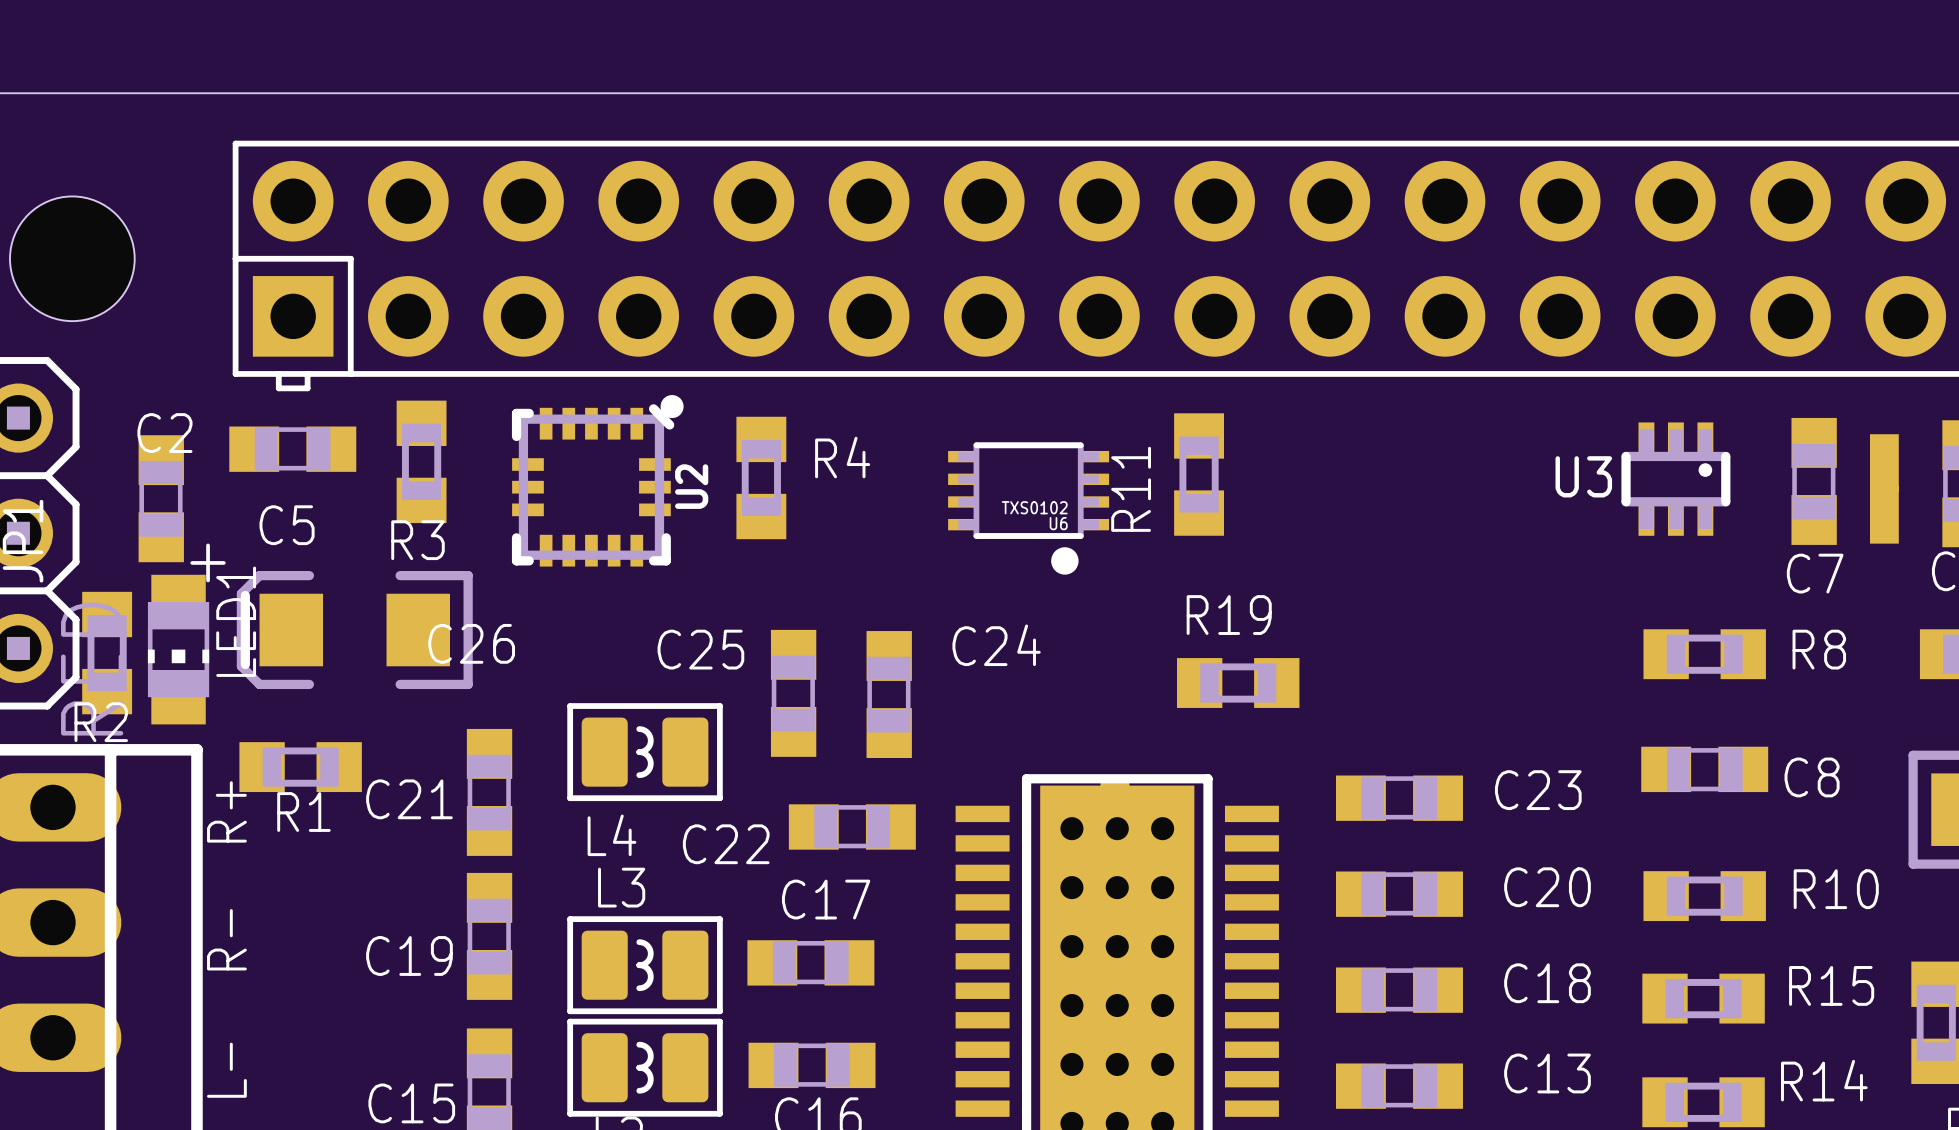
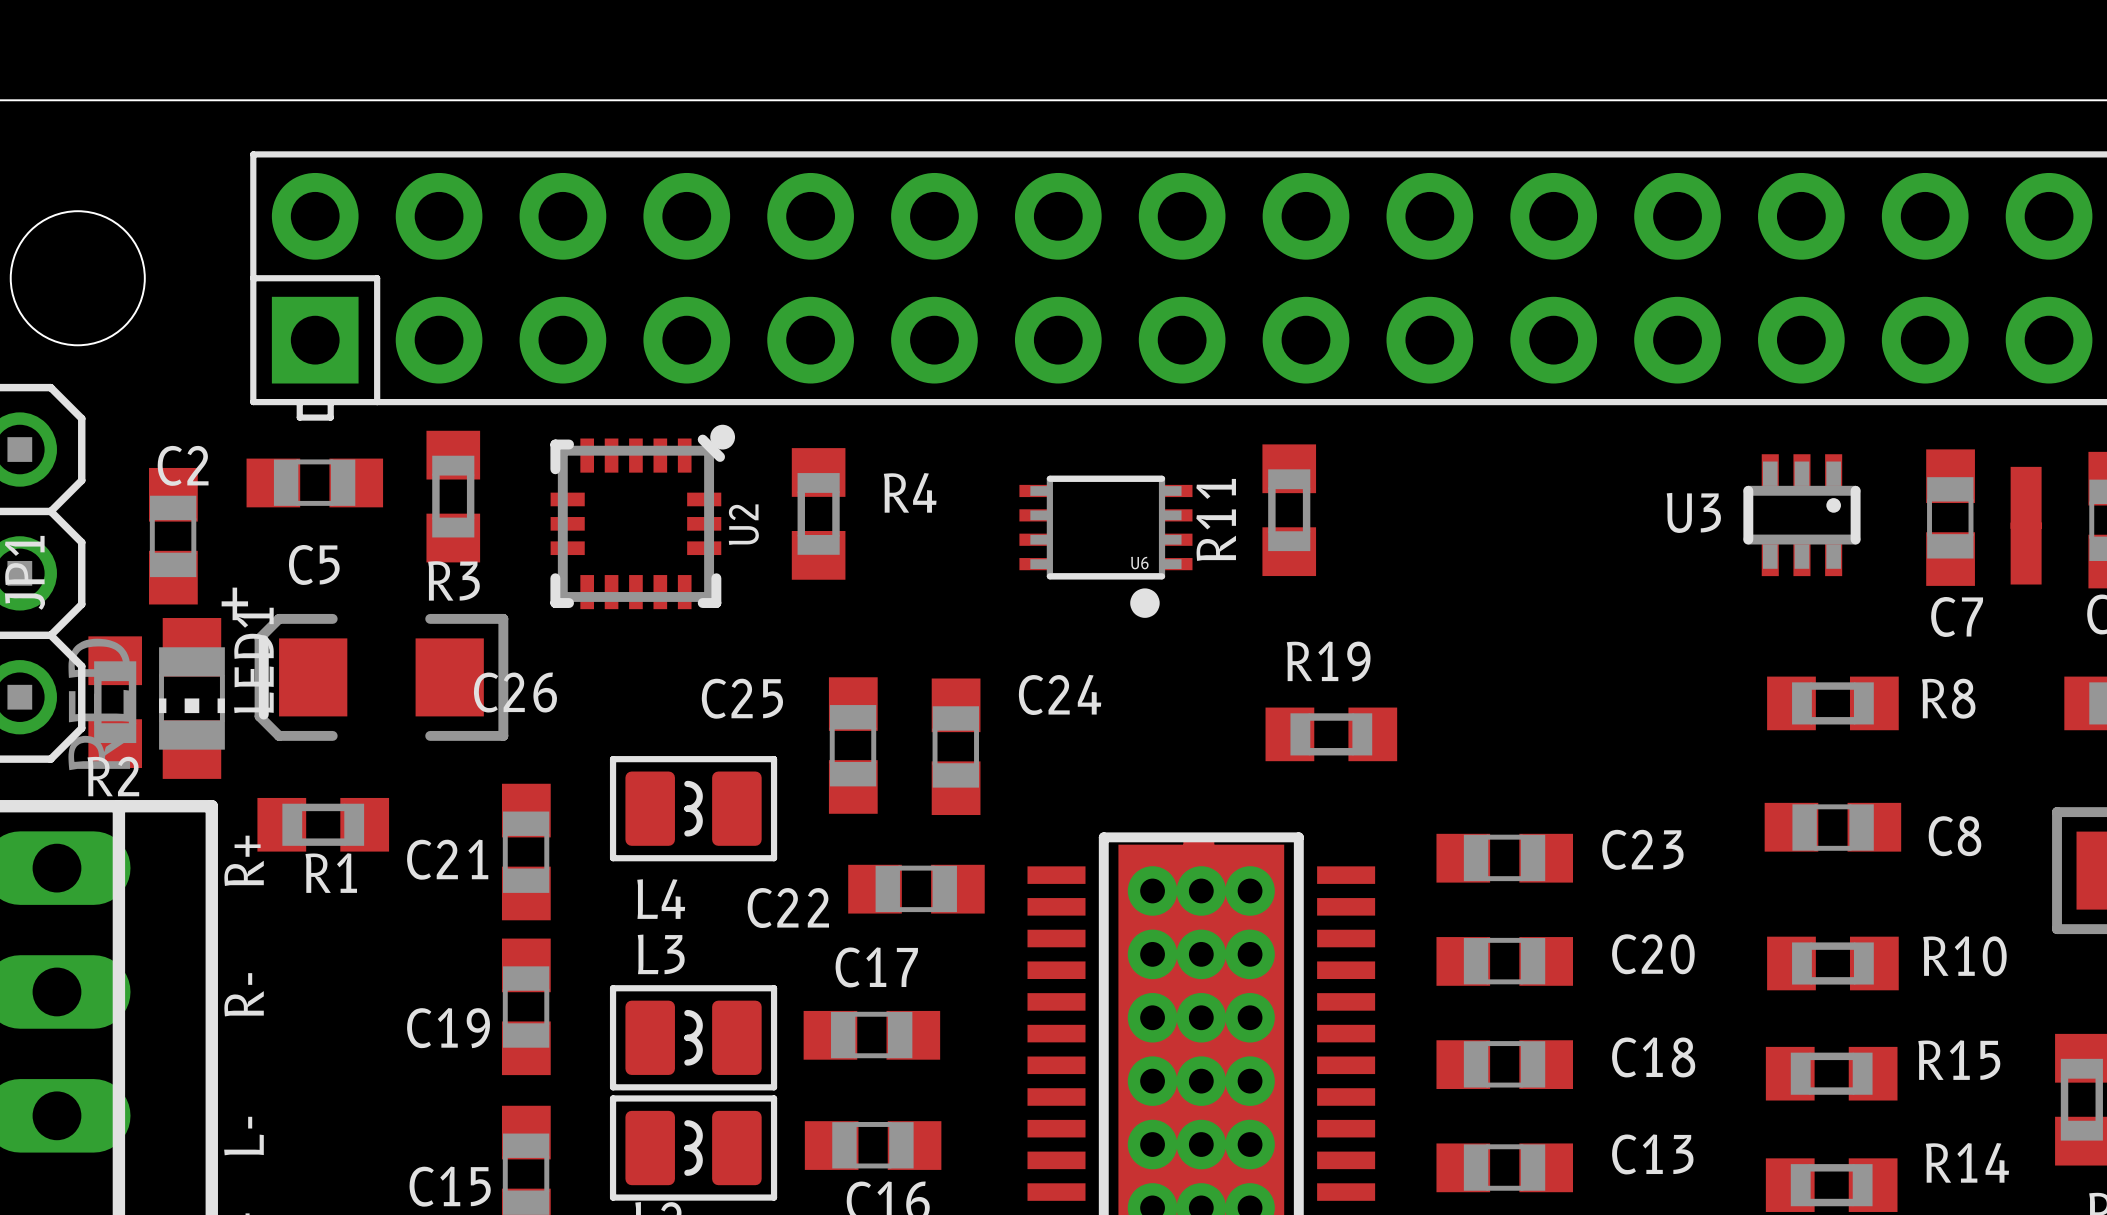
U6 value: TXS0102 (1034, 507) -> none

